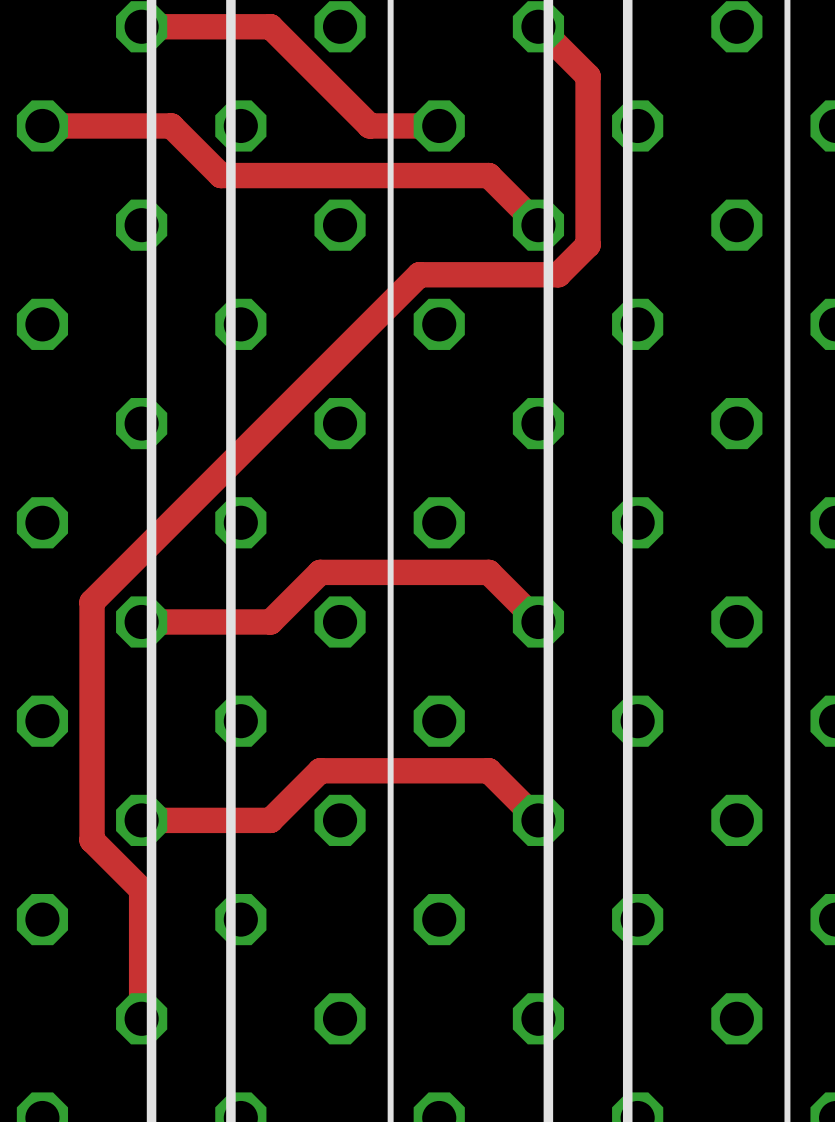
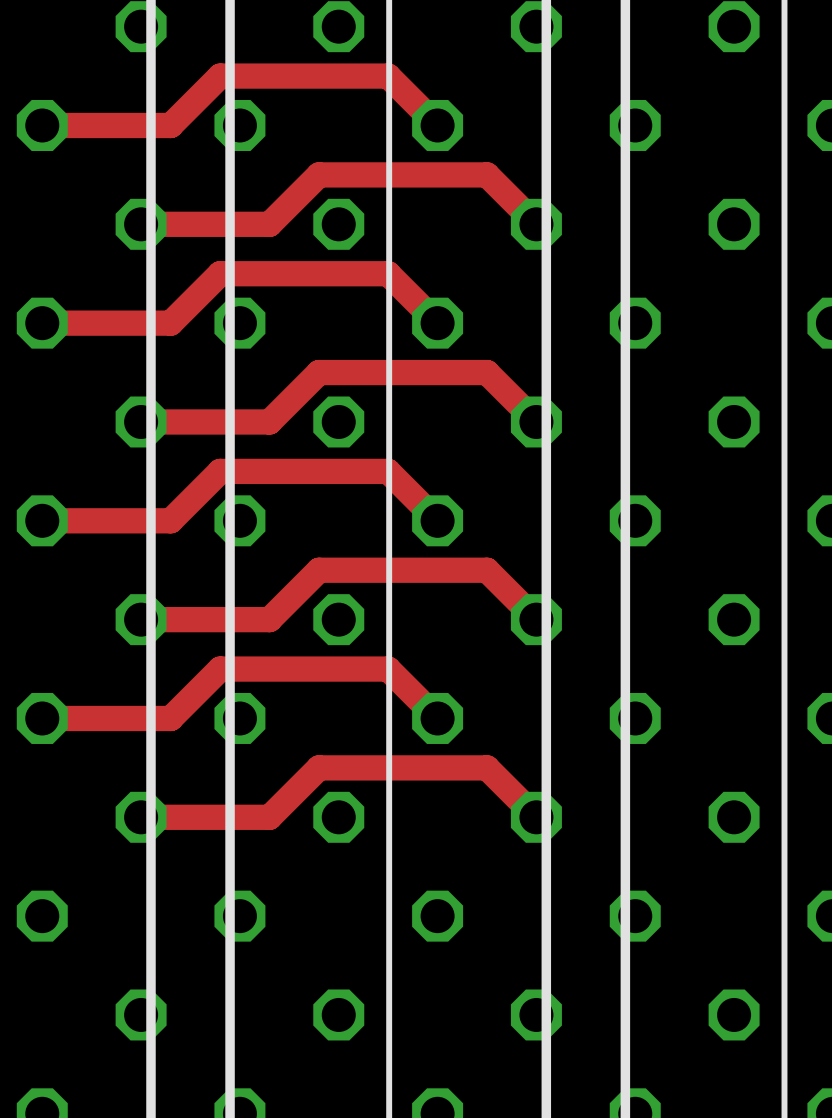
track: (141, 26) (270, 26) (369, 125) (439, 125) -> (170, 125) (220, 76) (388, 76) (437, 125)
track: (538, 26) (588, 76) (588, 245) (558, 274) (419, 274) (320, 373) -> (536, 421) (487, 372) (319, 372)
track: (171, 125) (221, 175) (320, 175) -> (141, 224) (269, 224) (319, 174)
track: none -> (42, 323) (170, 323) (220, 273) (388, 273) (437, 323)
track: (270, 423) (221, 473) -> (269, 421) (141, 421)
track: none -> (220, 471) (388, 471) (437, 520)
track: (171, 522) (92, 602) (92, 840) (141, 889) (141, 1018) -> (170, 520) (42, 520)
track: none -> (42, 718) (170, 718) (220, 669) (388, 669) (437, 718)

